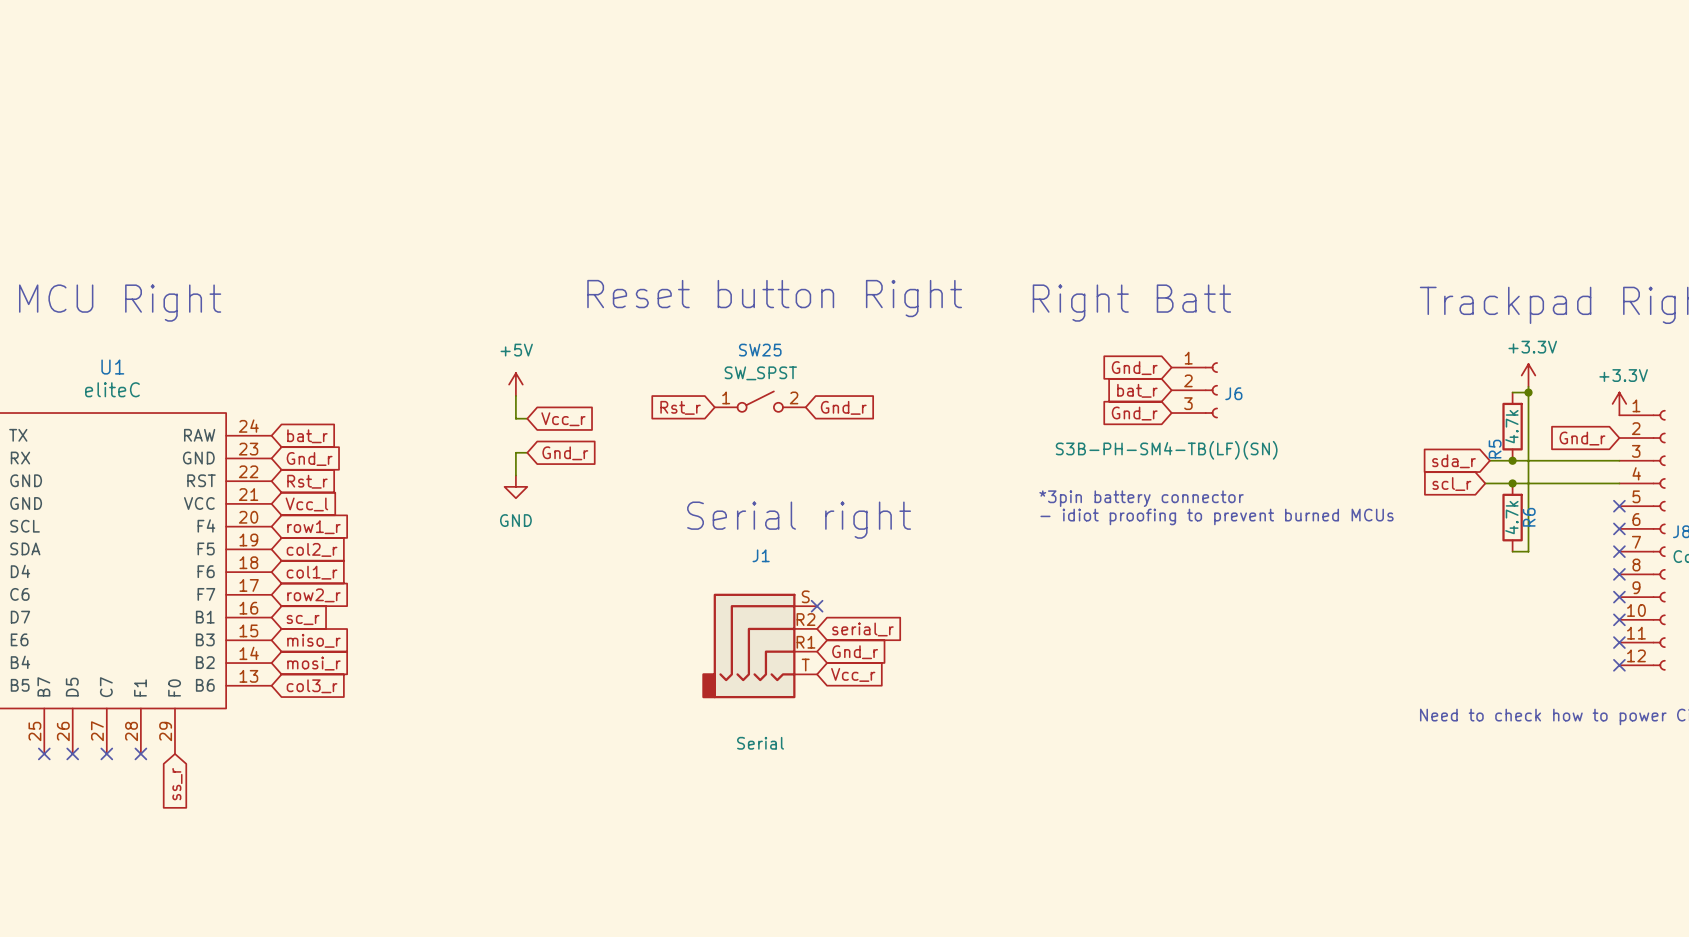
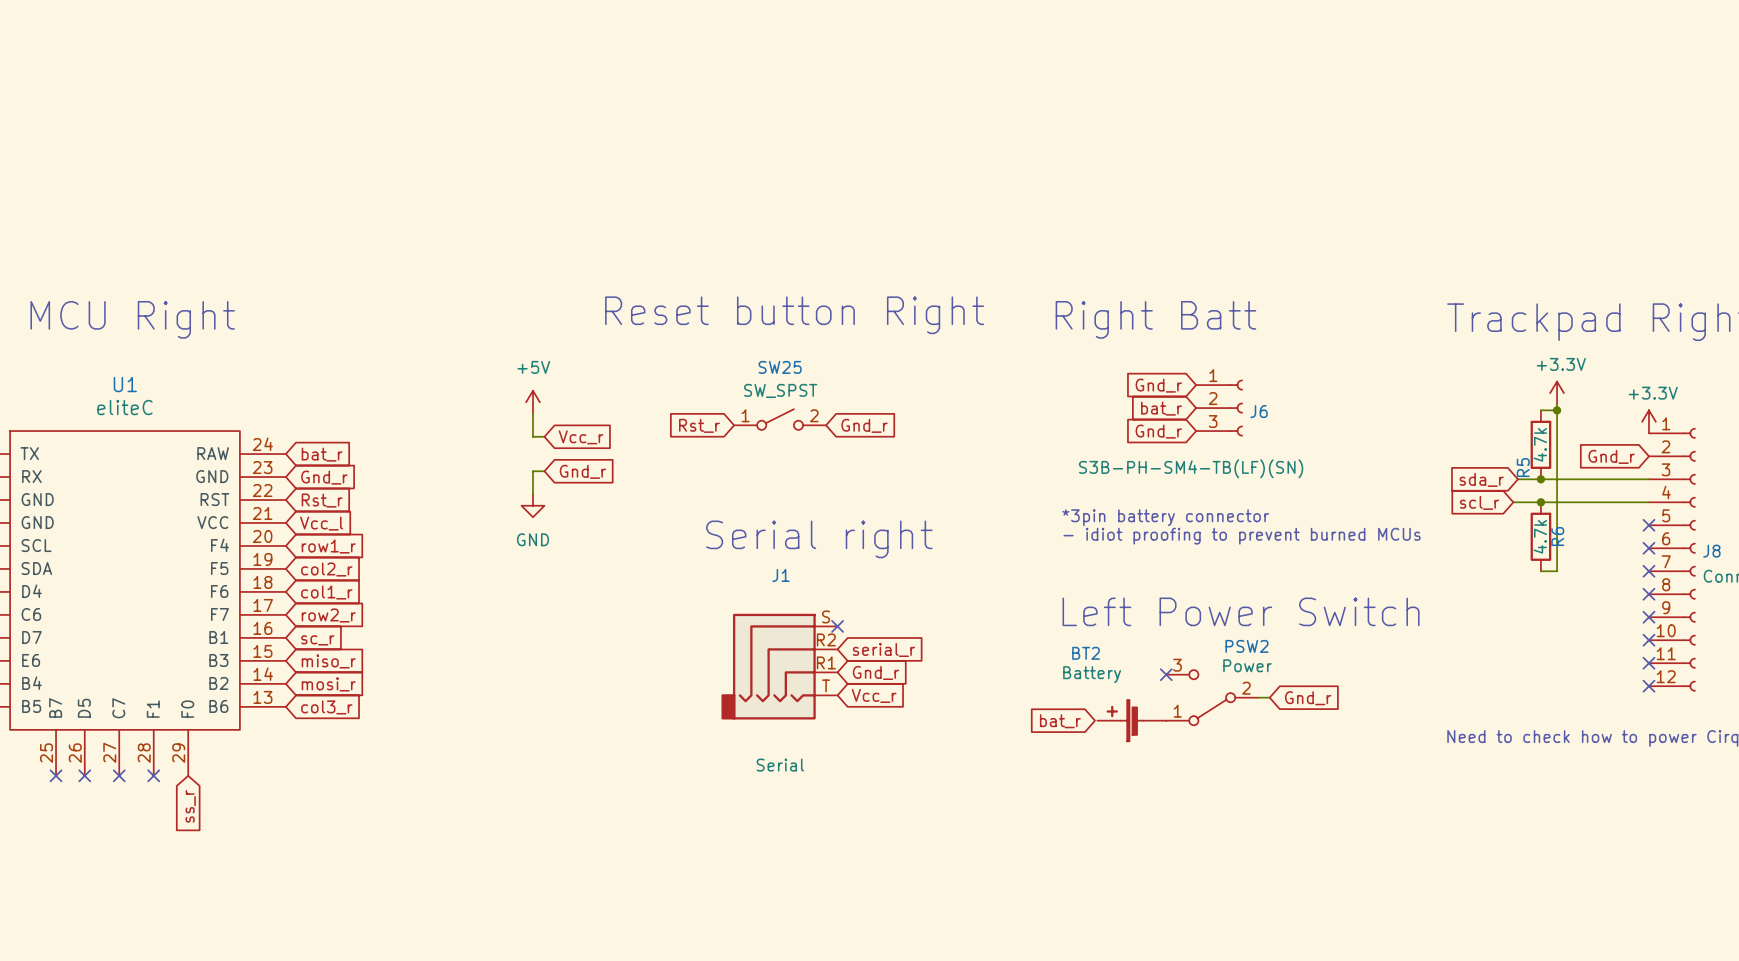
text: none -> Left Power Switch (1241, 611)
no-connect mark: none -> (1166, 674)
PSW2: none -> Power (1212, 697)
wire: none -> (1258, 697) (1269, 697)
global label: none -> Gnd_r (1308, 698)
global label: none -> bat_r (1060, 721)
BT2: none -> Battery (1131, 720)

